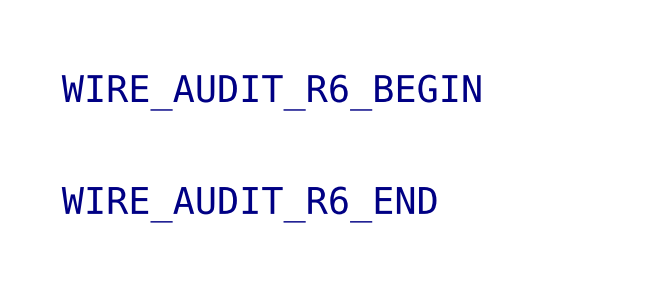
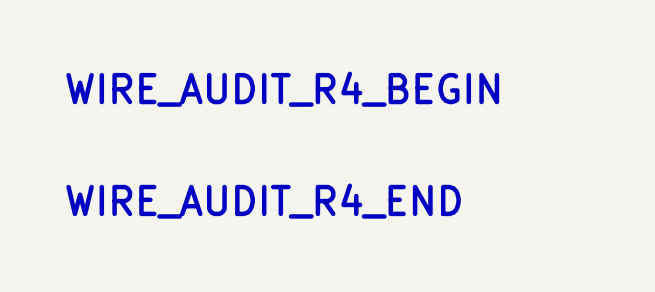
text: WIRE_AUDIT_R6_BEGIN (271, 92) -> WIRE_AUDIT_R4_BEGIN (282, 89)
text: WIRE_AUDIT_R6_END (249, 204) -> WIRE_AUDIT_R4_END (263, 201)

